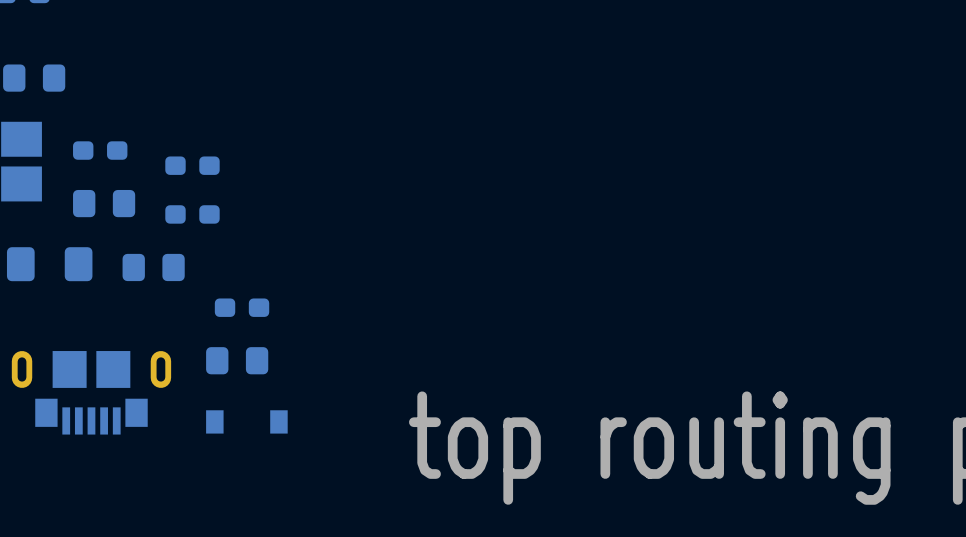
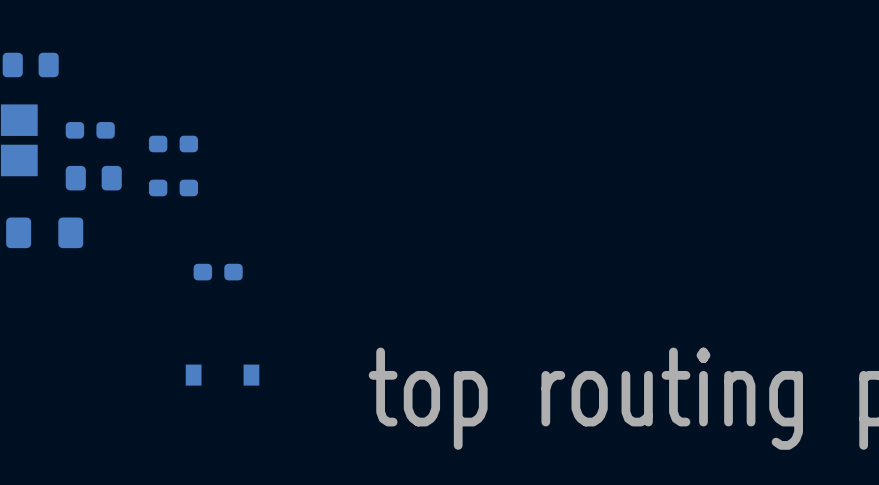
part: (153, 267) -> none
part: (237, 360) -> none
part: (91, 392) -> none

